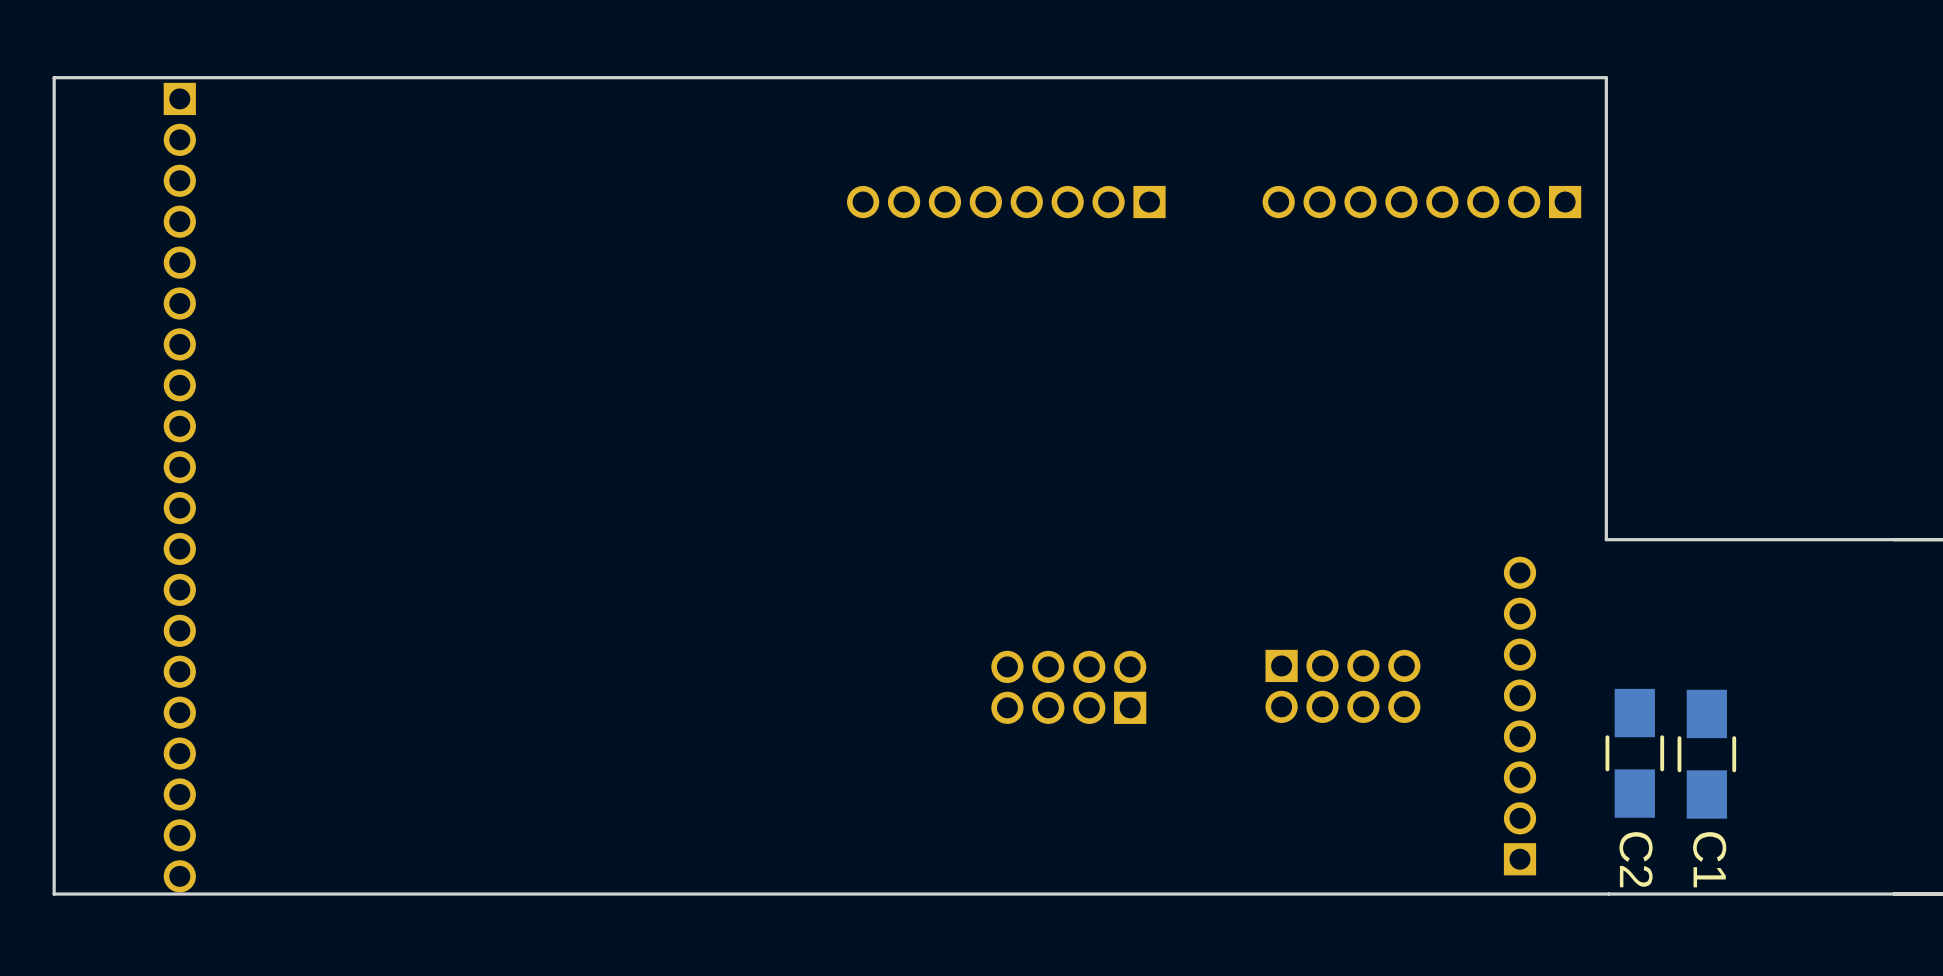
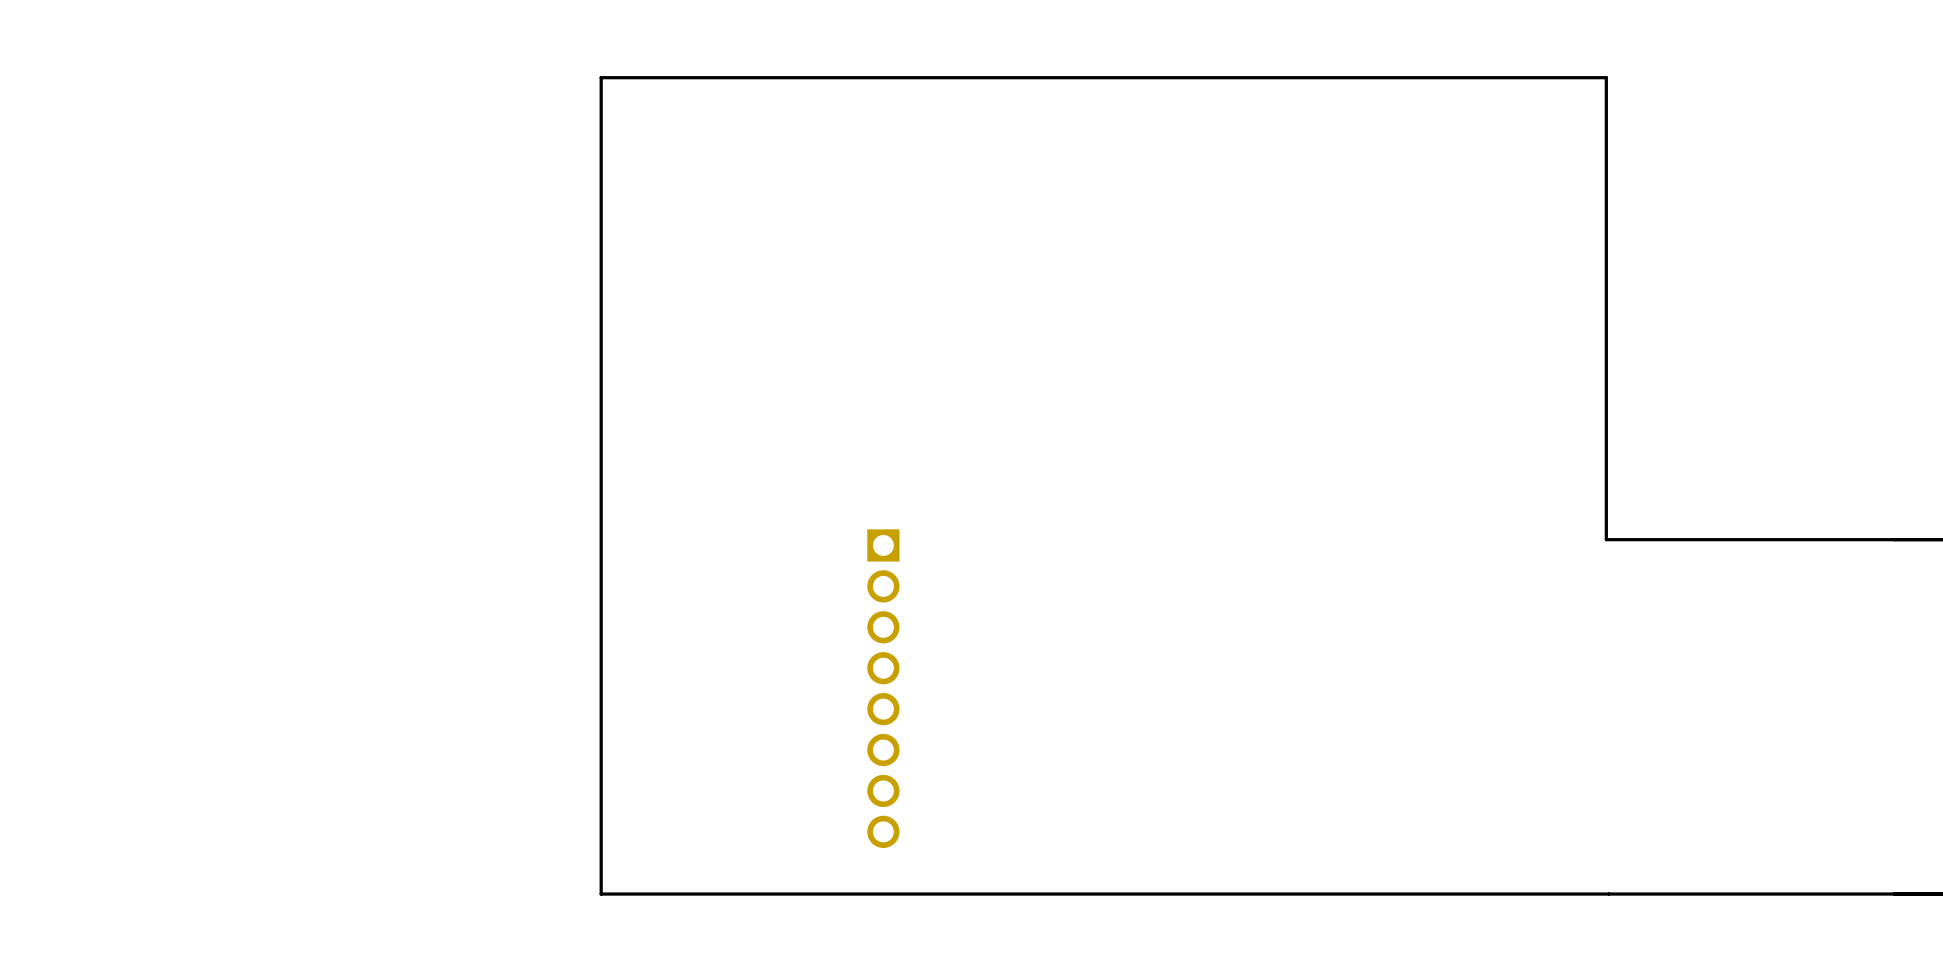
board edge: (601, 77) (54, 77) (54, 894) (601, 894) -> (601, 77) (601, 894)
part: (1006, 202) -> none
part: (1421, 202) -> none
part: (179, 487) -> none
part: (1342, 686) -> none
part: (1068, 687) -> none
part: none -> (883, 688)
part: (1519, 716) -> none
C2: (1634, 753) -> none
C1: (1706, 754) -> none

